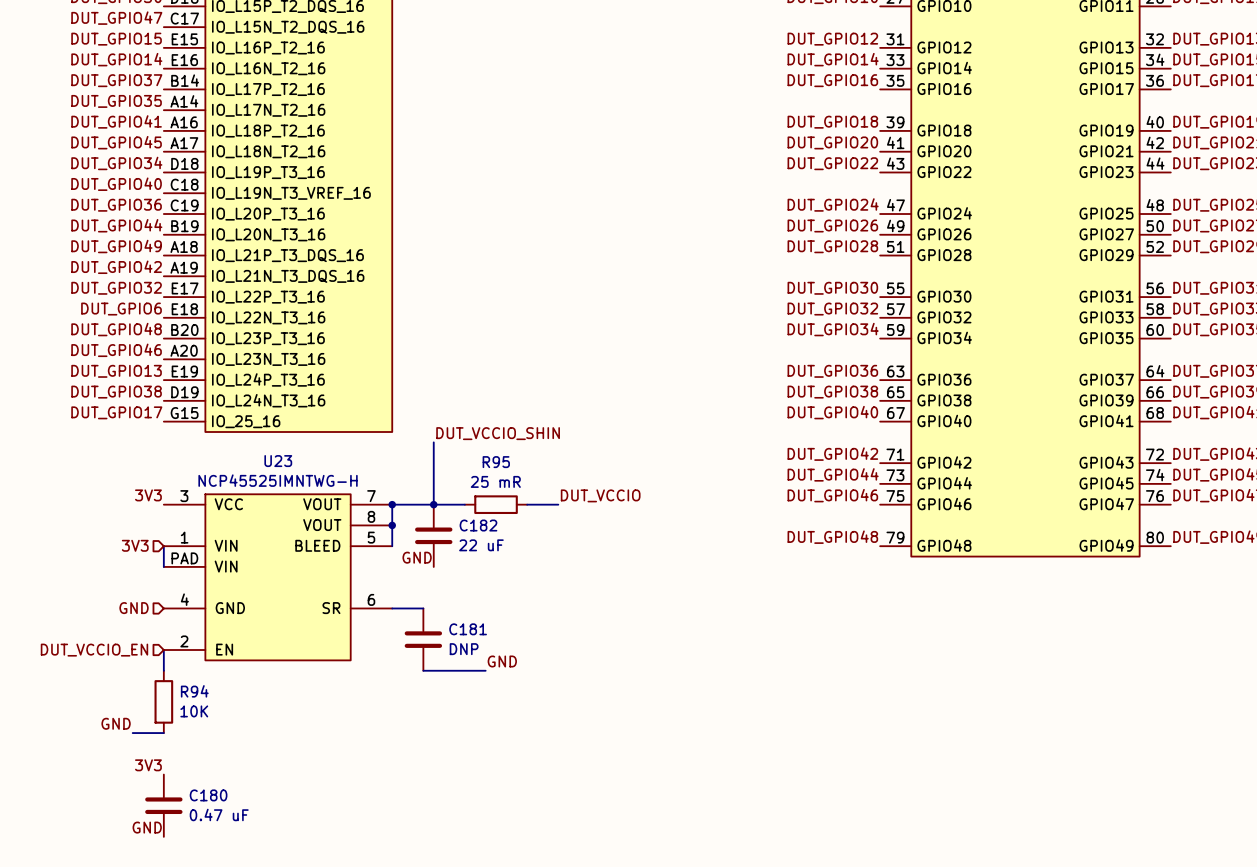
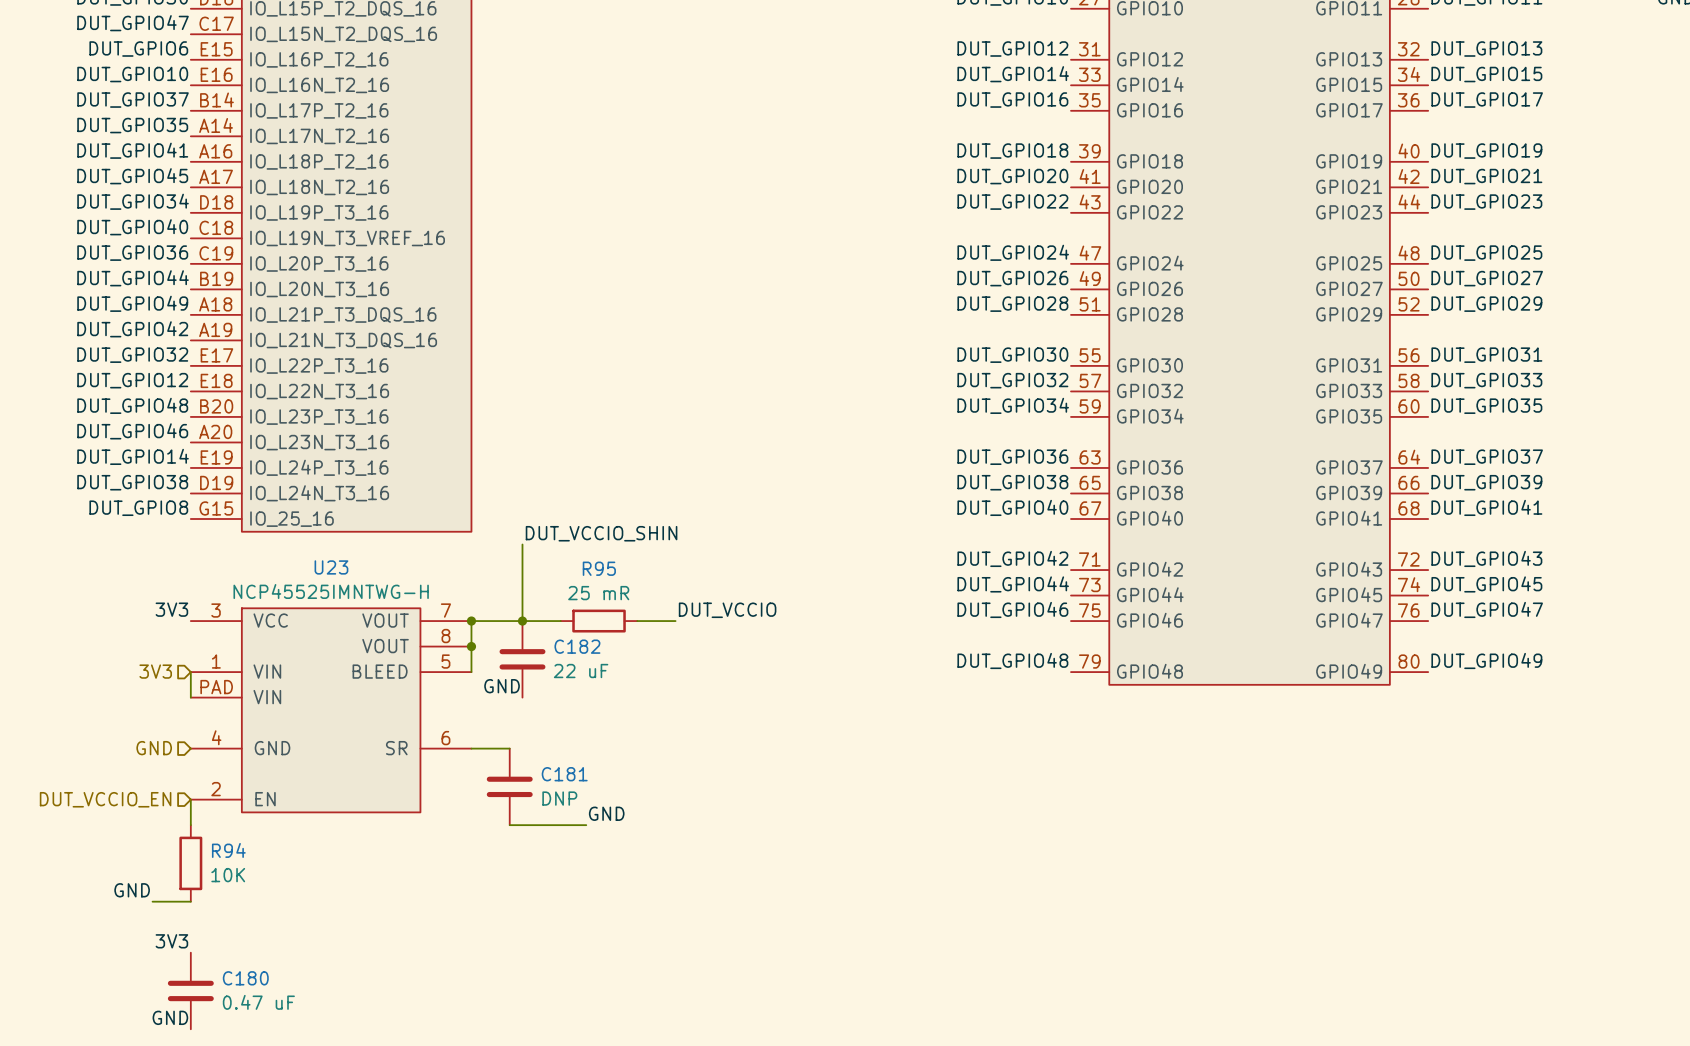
label: DUT_GPIO15 (116, 39) -> DUT_GPIO6 (138, 49)
label: DUT_GPIO14 (116, 59) -> DUT_GPIO10 (132, 74)
label: DUT_GPIO6 (121, 309) -> DUT_GPIO12 (132, 380)
label: DUT_GPIO13 (116, 371) -> DUT_GPIO14 (133, 456)
label: DUT_GPIO17 (116, 412) -> DUT_GPIO8 (138, 508)

